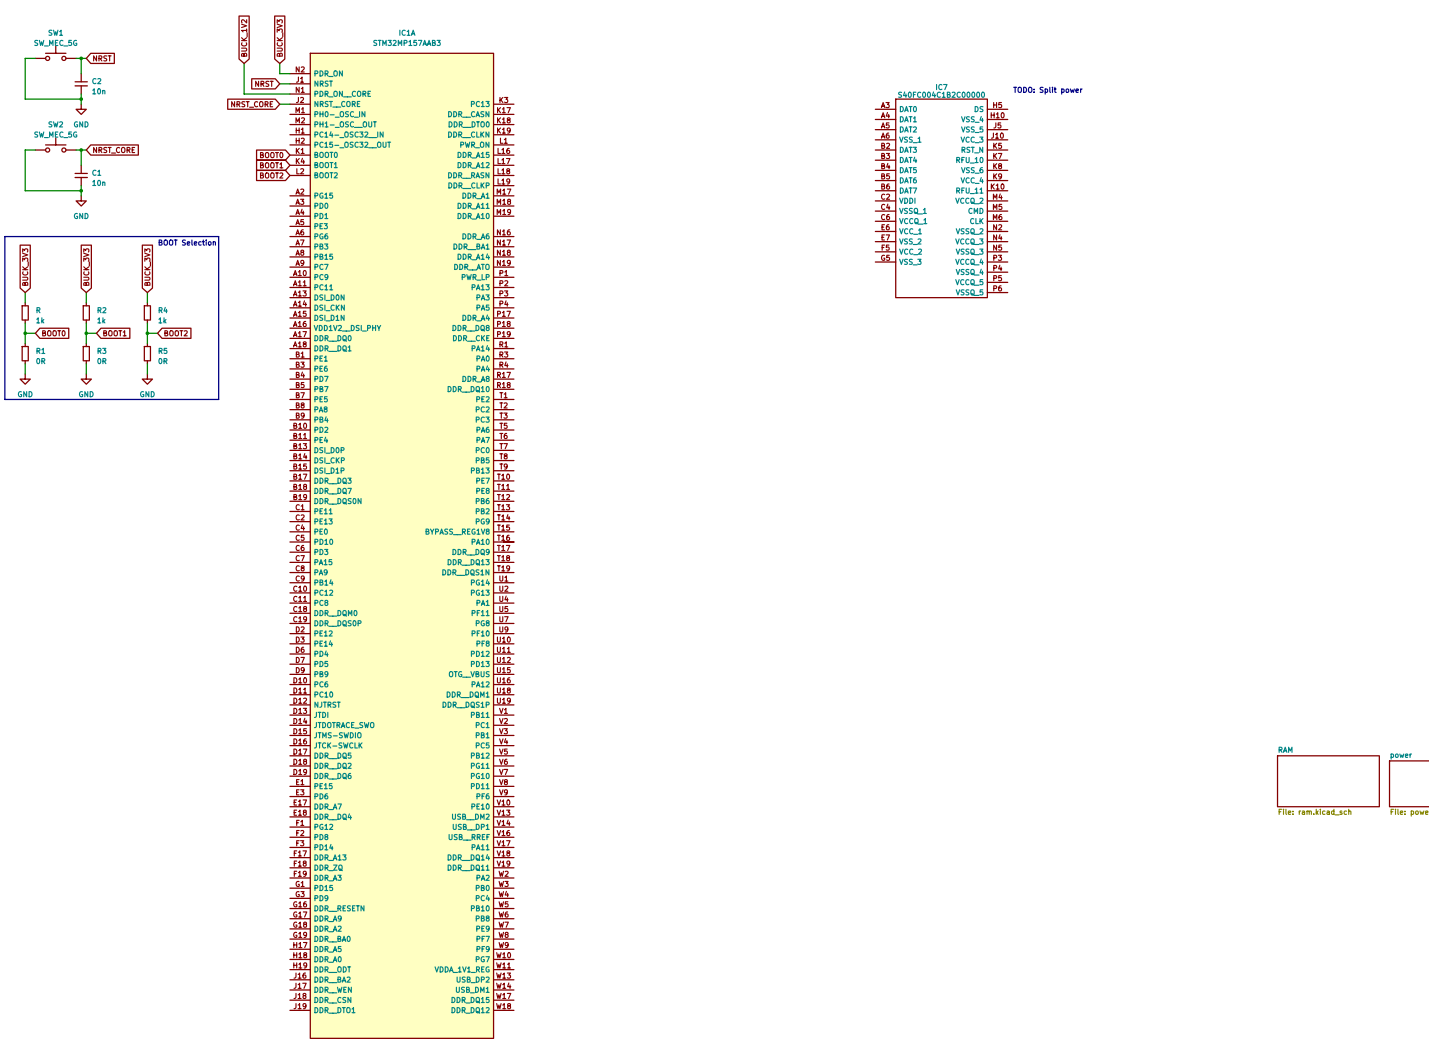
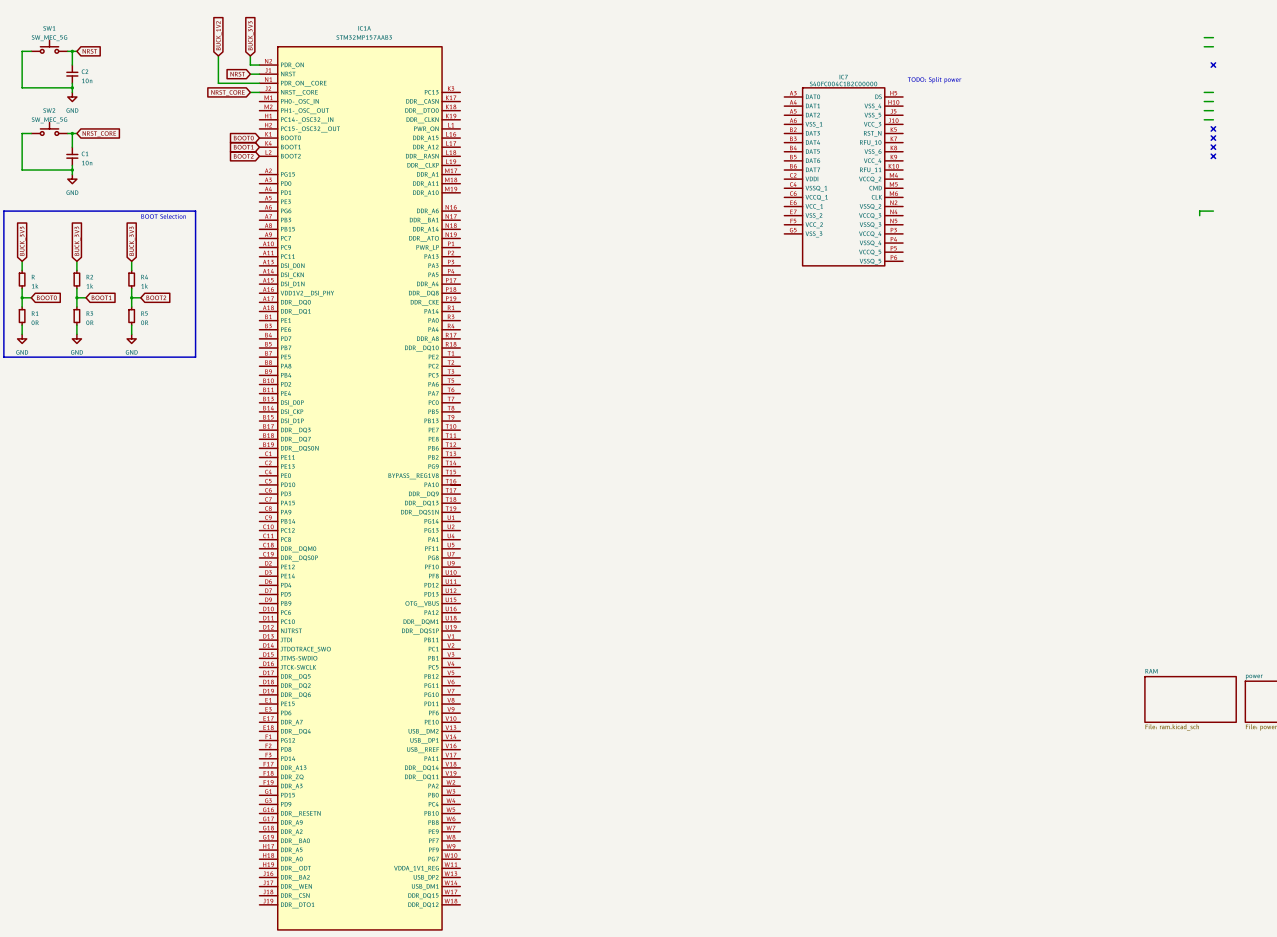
wire: none -> (1204, 37) (1213, 37)
wire: none -> (1204, 46) (1213, 46)
no-connect mark: none -> (1213, 65)
wire: none -> (1204, 92) (1213, 92)
wire: none -> (1204, 101) (1213, 101)
wire: none -> (1204, 110) (1213, 110)
wire: none -> (1204, 119) (1213, 119)
no-connect mark: none -> (1213, 128)
no-connect mark: none -> (1213, 138)
no-connect mark: none -> (1213, 147)
no-connect mark: none -> (1213, 156)
wire: none -> (1213, 211) (1199, 211) (1199, 215)

